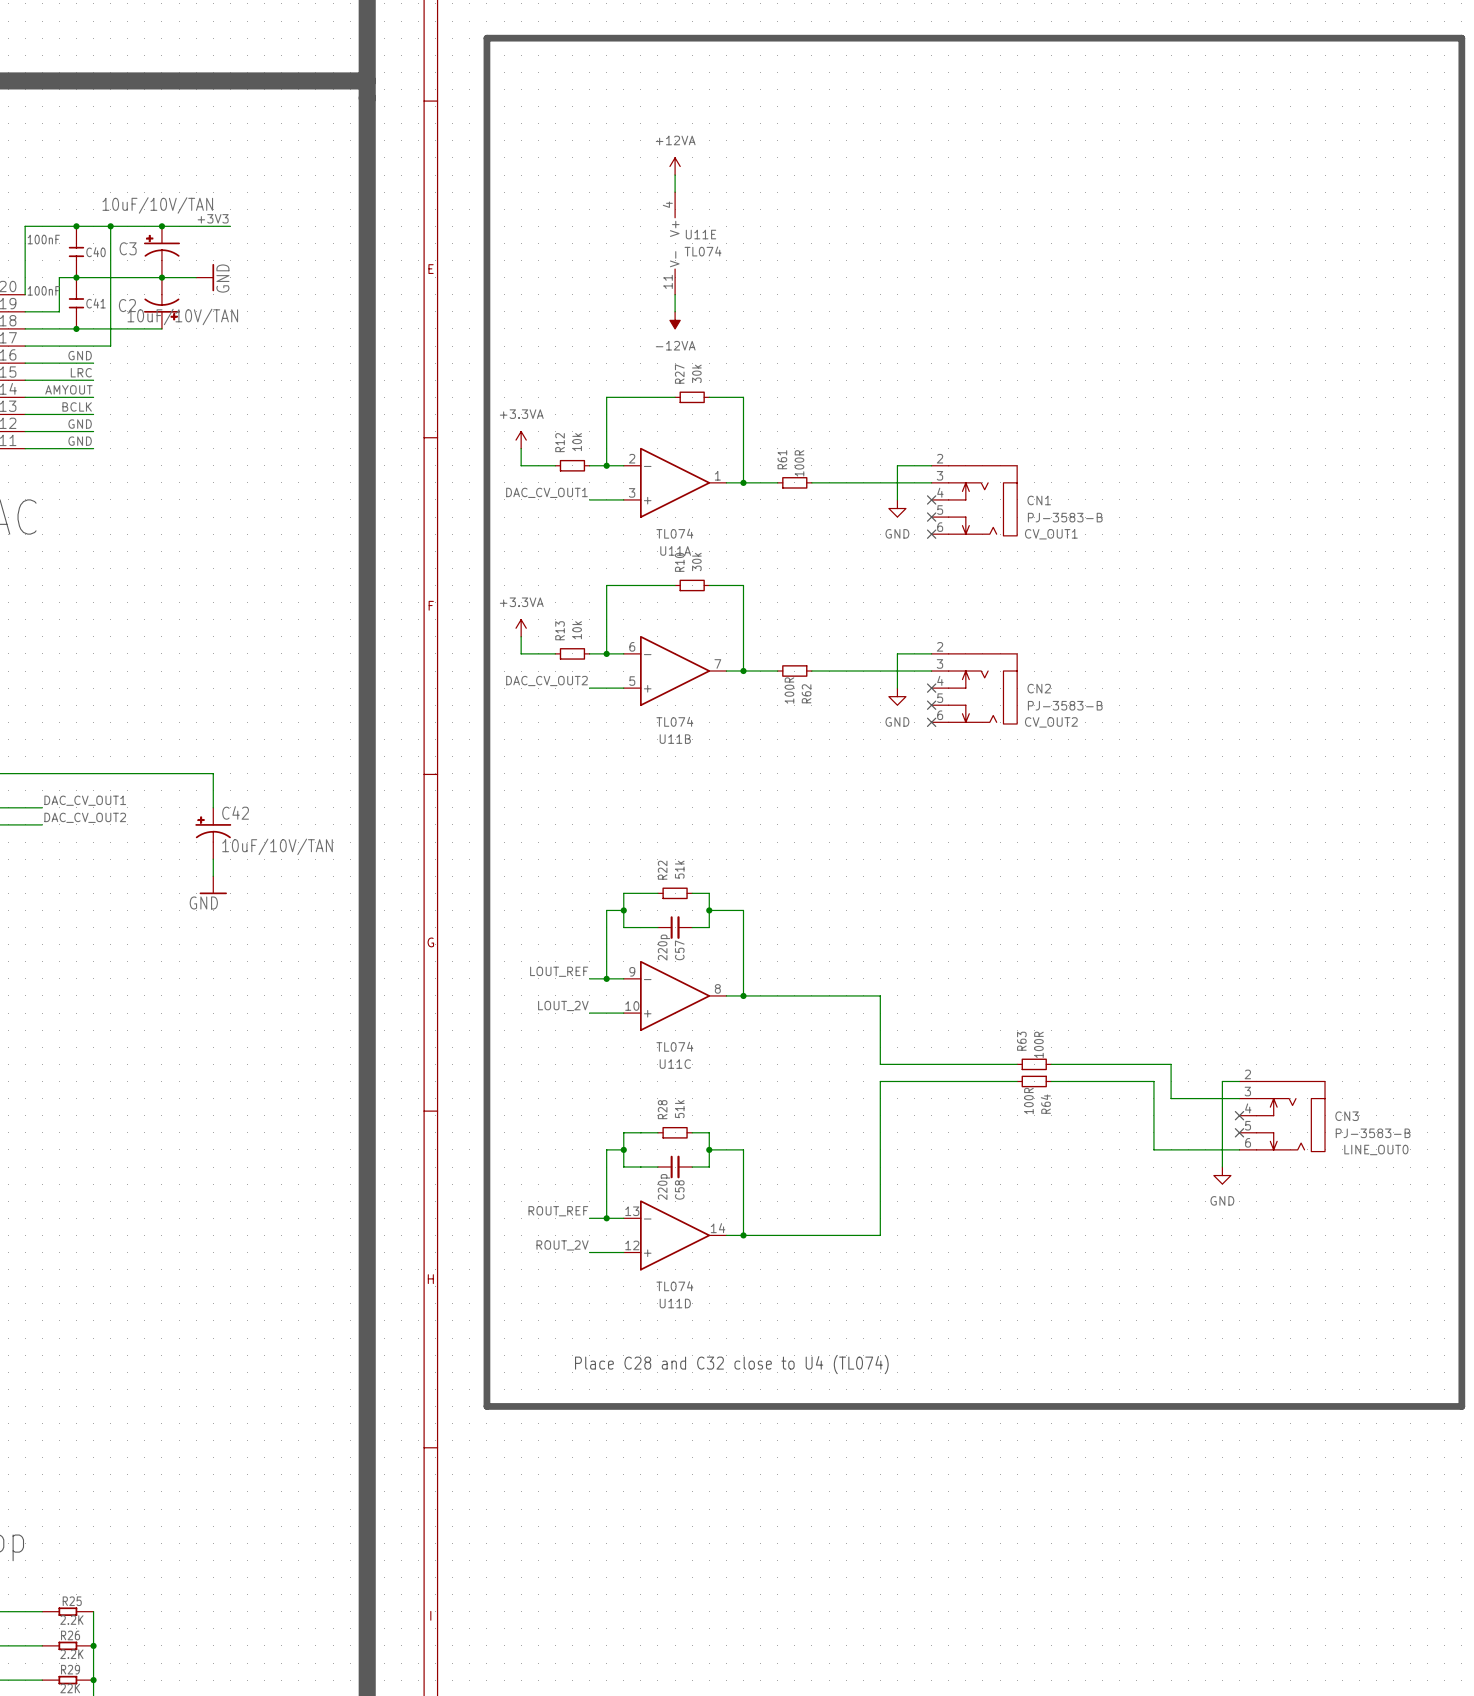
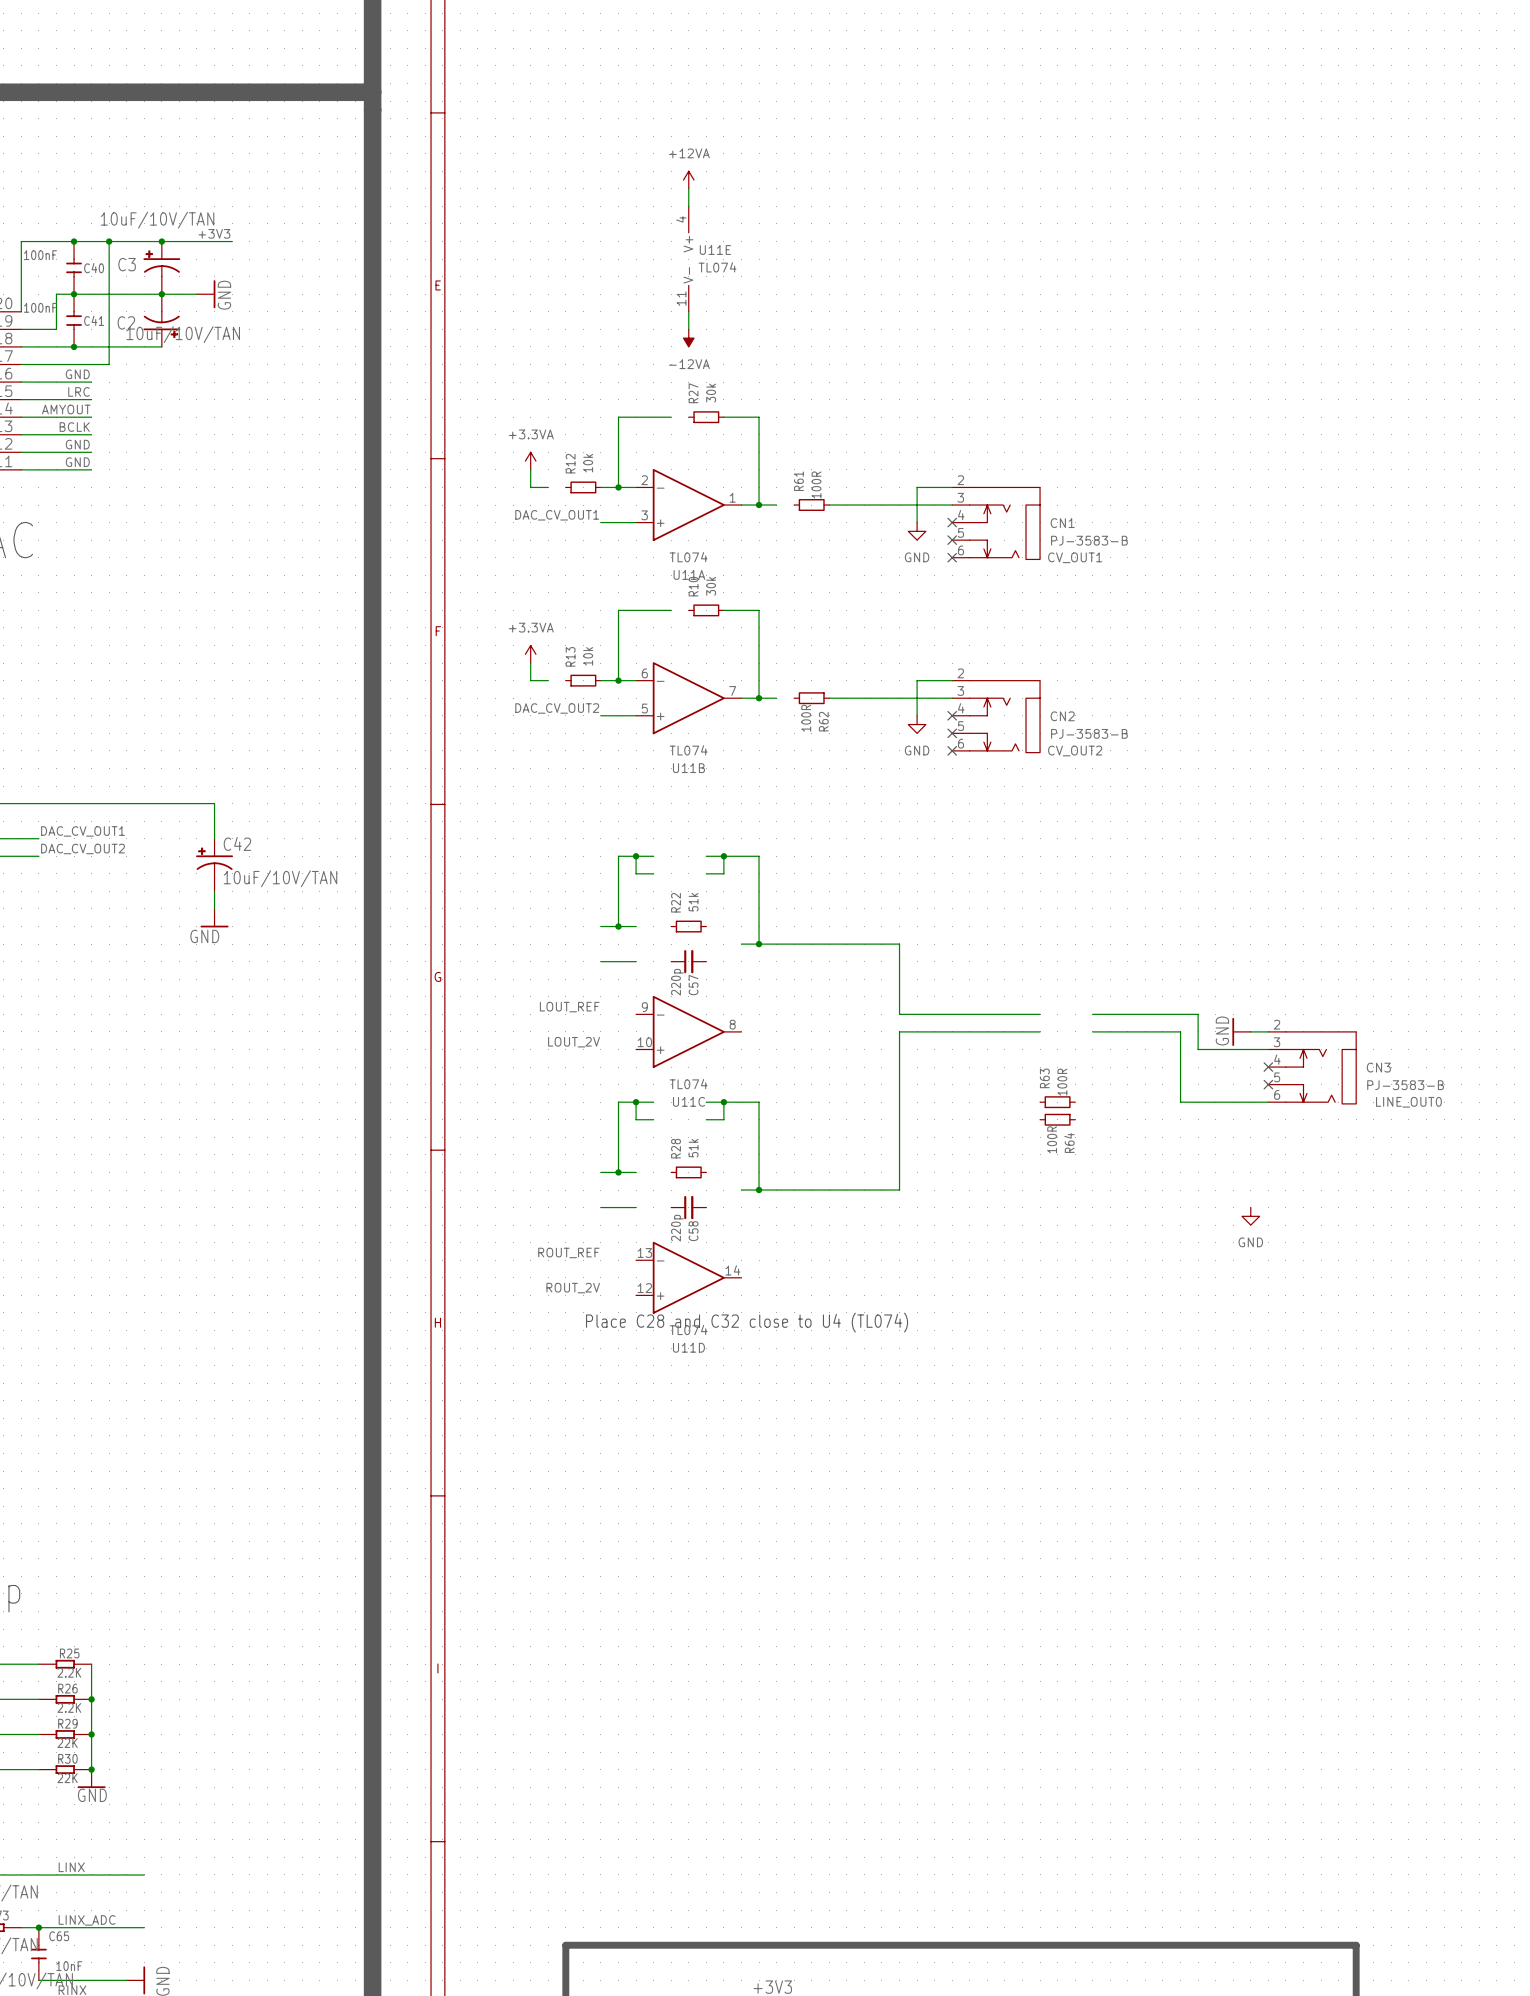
line: (486, 38) (1461, 38) (1461, 1406) (486, 1406) (486, 38) -> none
wire: (657, 397) (675, 397) -> none
wire: (538, 465) (555, 465) -> none
wire: (760, 482) (777, 482) -> none
wire: (657, 585) (675, 585) -> none
wire: (538, 653) (555, 653) -> none
wire: (760, 671) (777, 671) -> none
wire: none -> (636, 856) (636, 873) (653, 873)
junction: none -> (636, 856)
wire: none -> (653, 856) (618, 856) (618, 926)
wire: none -> (706, 856) (759, 856) (759, 944) (899, 944) (899, 1014) (1040, 1014)
wire: none -> (723, 856) (723, 873) (706, 873)
junction: none -> (723, 856)
wire: (657, 893) (623, 893) (623, 927) (657, 927) -> none
wire: (692, 893) (709, 893) (709, 927) (692, 927) -> none
wire: (623, 910) (606, 910) (606, 978) -> none
junction position: (623, 910) -> (618, 926)
wire: (709, 910) (726, 910) -> none
junction position: (709, 910) -> (759, 944)
wire: (743, 910) (743, 995) -> none
wire: (589, 978) (623, 978) -> (600, 926) (636, 926)
junction: (606, 978) -> none
wire: none -> (1092, 1014) (1198, 1014) (1198, 1049) (1268, 1049)
wire: (726, 995) (880, 995) -> (1040, 1031) (899, 1031)
junction: (743, 995) -> none
power symbol: none -> GND (1241, 1031)
wire: none -> (1250, 1031) (1268, 1031)
wire: (589, 1013) (623, 1013) -> (600, 961) (636, 961)
no-connect mark: none -> (1268, 1067)
no-connect mark: none -> (1268, 1084)
wire: none -> (636, 1102) (636, 1119) (653, 1119)
junction: none -> (636, 1102)
wire: none -> (653, 1102) (618, 1102) (618, 1172)
wire: none -> (723, 1102) (723, 1119) (706, 1119)
junction: none -> (723, 1102)
wire: (880, 1064) (1017, 1064) -> (899, 1102) (899, 1119)
wire: (1051, 1064) (1153, 1064) -> (1092, 1031) (1180, 1031) (1180, 1102)
wire: (1171, 1064) (1171, 1098) (1239, 1098) -> (1198, 1102) (1268, 1102)
wire: (880, 1081) (1017, 1081) -> none
wire: (1051, 1081) (1153, 1081) (1153, 1149) (1239, 1149) -> none
wire: (1239, 1081) (1222, 1081) (1222, 1167) -> none
no-connect mark: (1239, 1115) -> none
CN3 position: (1282, 1116) -> (1312, 1067)
wire: (657, 1132) (623, 1132) (623, 1167) (657, 1167) -> none
wire: (692, 1132) (709, 1132) (709, 1167) (692, 1167) -> none
no-connect mark: (1239, 1132) -> none
wire: (623, 1149) (606, 1149) (606, 1218) -> none
junction position: (623, 1149) -> (618, 1172)
wire: (709, 1149) (726, 1149) -> none
junction position: (709, 1149) -> (759, 1190)
wire: (743, 1149) (743, 1235) -> none
wire: (880, 1149) (880, 1235) (726, 1235) -> (899, 1190) (759, 1190) (759, 1102) (706, 1102)
wire: (589, 1218) (623, 1218) -> (600, 1172) (636, 1172)
junction: (606, 1218) -> none
junction: (743, 1235) -> none
wire: (589, 1252) (623, 1252) -> (600, 1207) (636, 1207)
text position: Place C28 and C32 close to U4 (TL074) (731, 1364) -> Place C28 and C32 close to U4 (TL074) (747, 1322)

